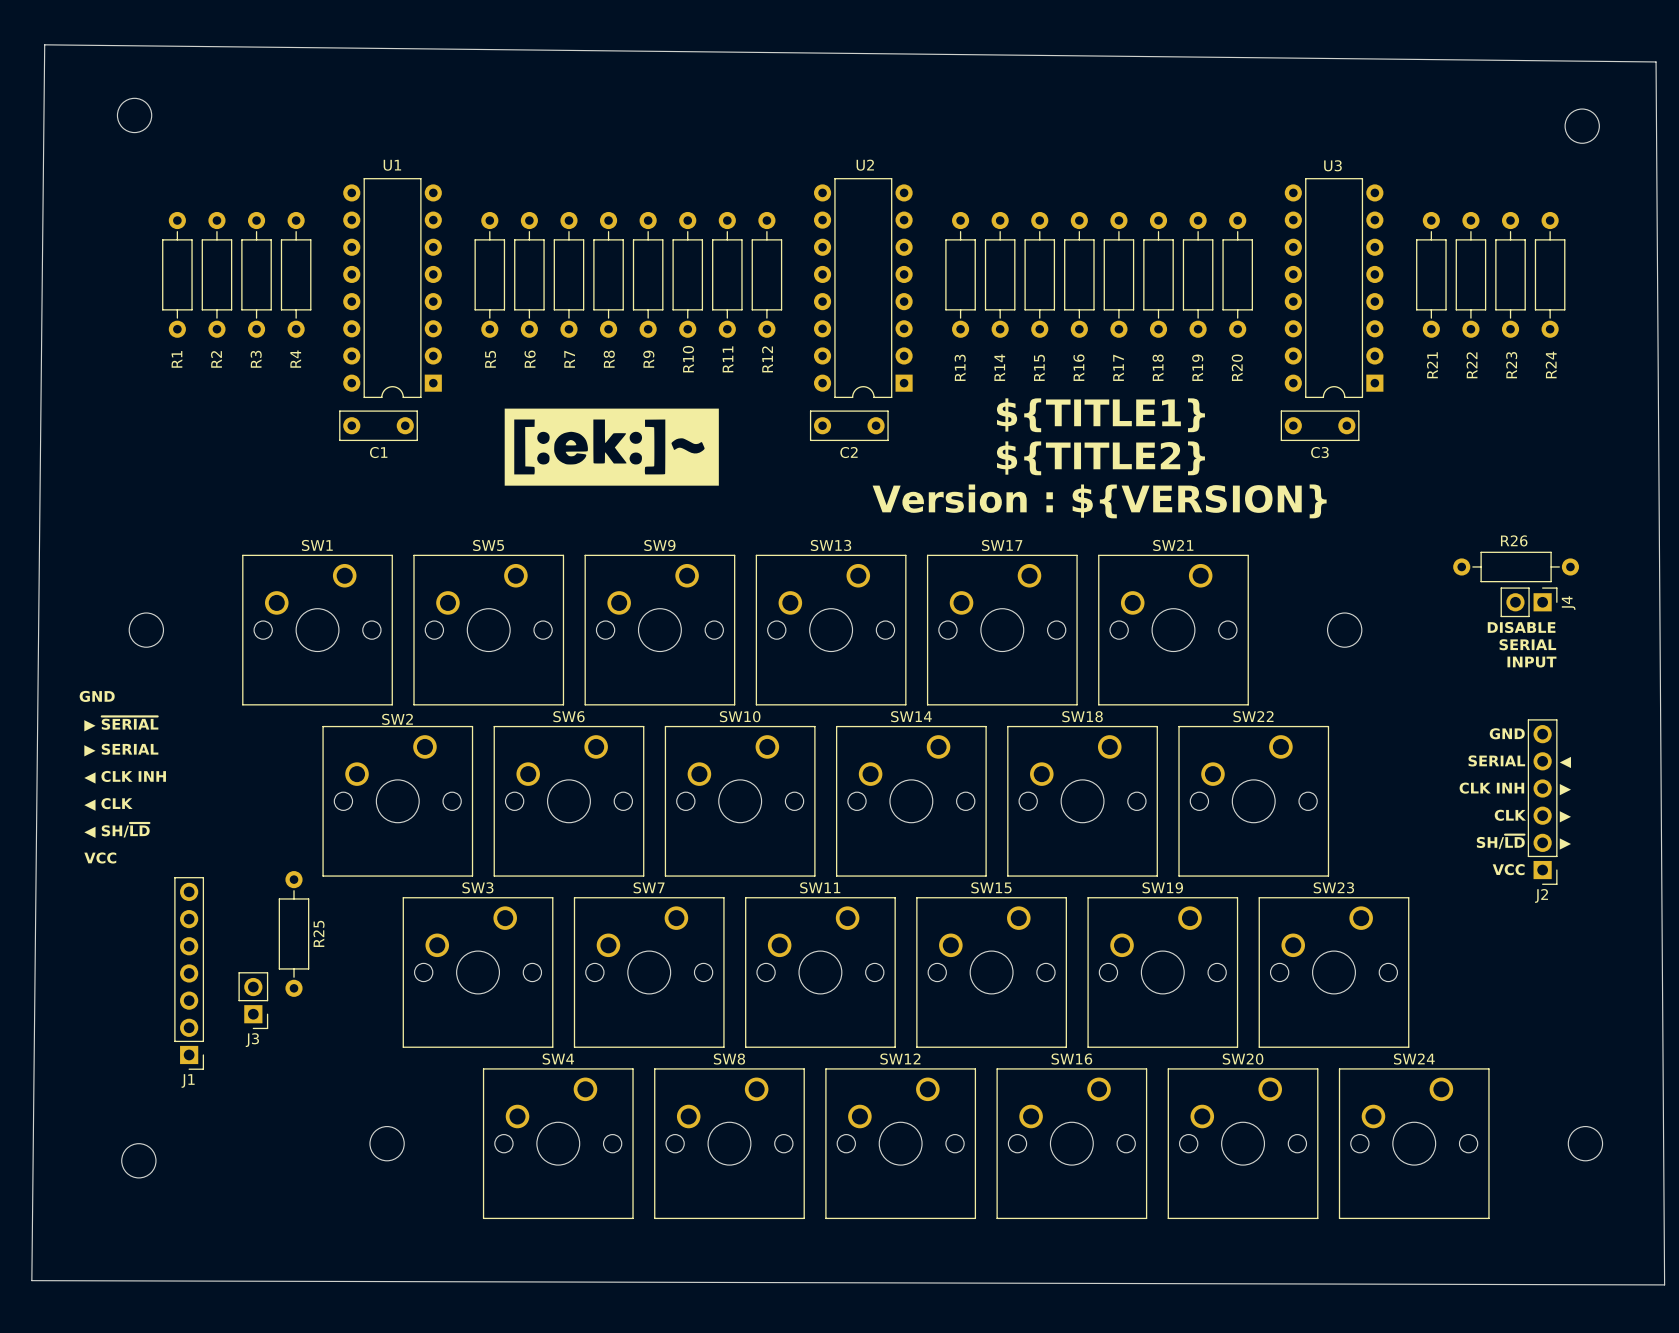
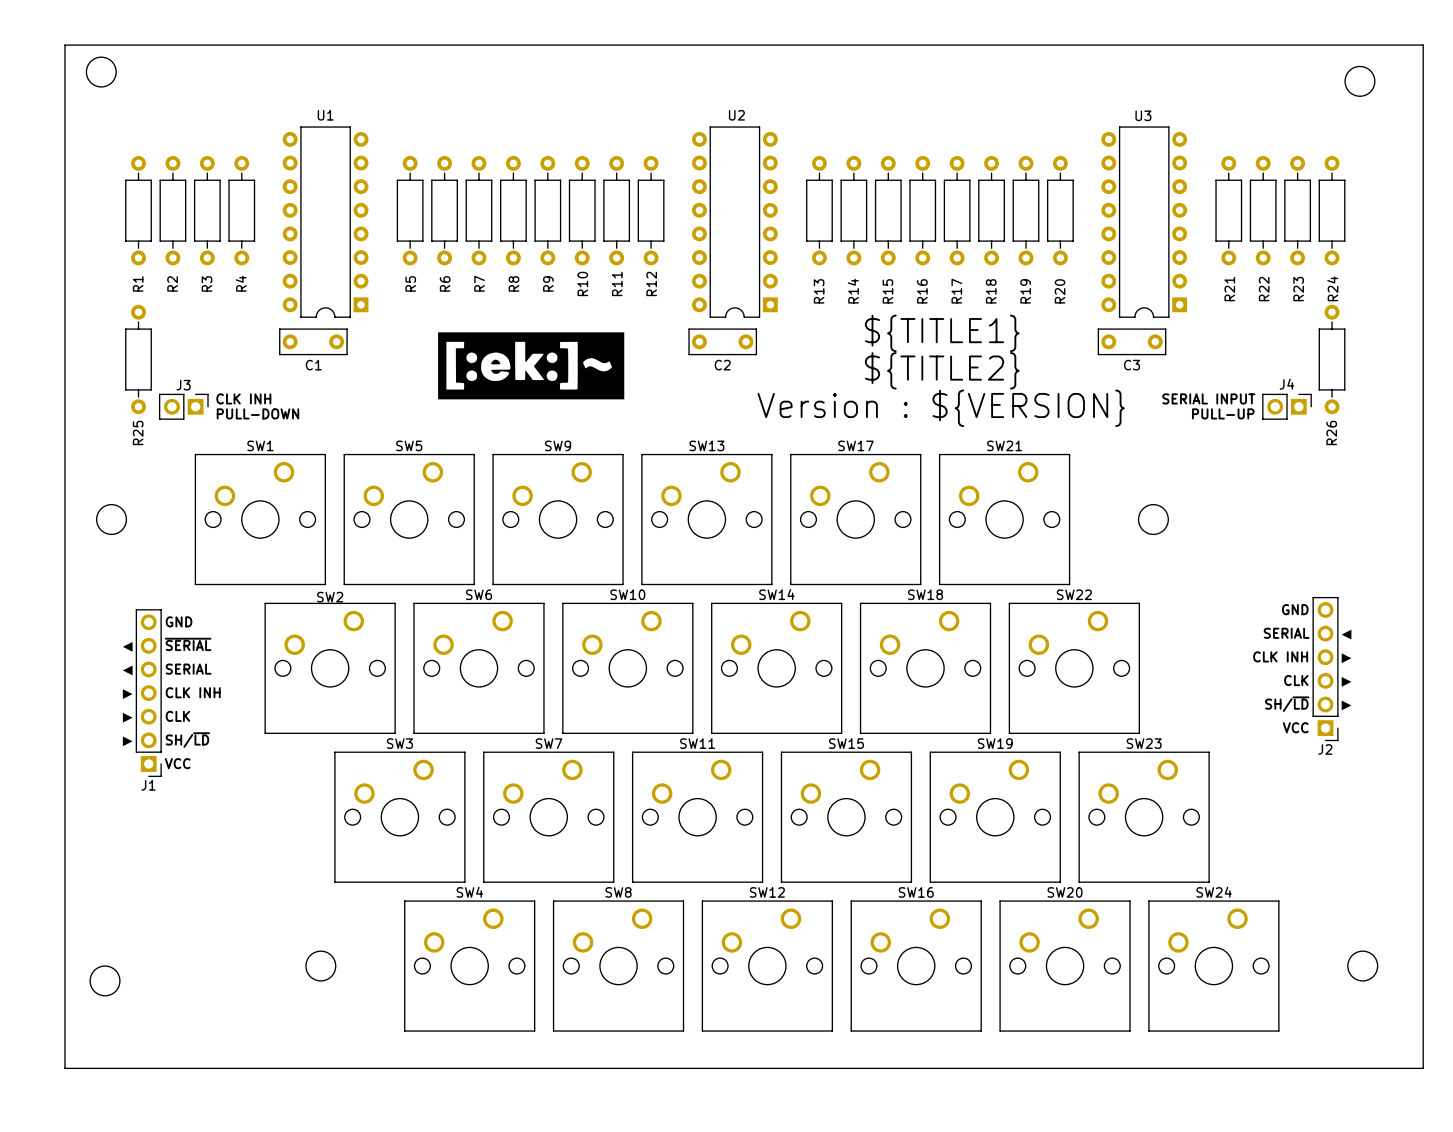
board edge: (44, 44) (1656, 61) (1664, 1284) (31, 1280) (44, 44) -> (65, 45) (65, 1068) (1423, 1068) (1423, 45) (65, 45)
drawing position: (611, 447) -> (531, 365)
text: none -> CLK INH (243, 398)
text: none -> SERIAL INPUT (1208, 398)
text: none -> PULL-DOWN (257, 413)
text: none -> PULL-UP (1223, 413)
R26 name position: R26 (1514, 540) -> R26 (1331, 432)
R26 rotation: 0° (1516, 566) -> 90° clockwise (1332, 359)
R26 position: (1516, 566) -> (1332, 359)
J4 position: (1529, 602) -> (1287, 406)
J4 name rotation: 0° (1568, 603) -> 90° clockwise (1287, 384)
J4 name position: J4 (1568, 603) -> J4 (1287, 384)
text: DISABLE (1521, 627) -> none
text: SERIAL (1527, 644) -> none
text: INPUT (1531, 662) -> none
text position: GND (97, 696) -> GND (179, 621)
text: ▶ ~{SERIAL} (121, 723) -> none
text: ▶ SERIAL (121, 750) -> none
text: none -> ~{SERIAL} (188, 644)
text: none -> ◀ (127, 646)
text: ◀ CLK INH (125, 777) -> none
text: none -> SERIAL (188, 669)
text: none -> ◀ (127, 670)
text: ◀ CLK (108, 804) -> none
text: none -> CLK INH (193, 692)
text: ◀ SH/~{LD} (117, 830) -> none
text: none -> ▶ (127, 694)
text: none -> CLK (177, 716)
text position: VCC (100, 857) -> VCC (177, 763)
text: none -> ▶ (127, 717)
text: none -> SH/~{LD} (187, 740)
text: none -> ▶ (127, 741)
R25 position: (294, 933) -> (138, 359)
R25 name position: R25 (318, 933) -> R25 (138, 432)
J1 position: (189, 973) -> (148, 693)
J3 rotation: 0° (253, 1000) -> 90° counterclockwise (183, 406)
J3 position: (253, 1000) -> (183, 406)
J3 name position: J3 (252, 1040) -> J3 (183, 385)

